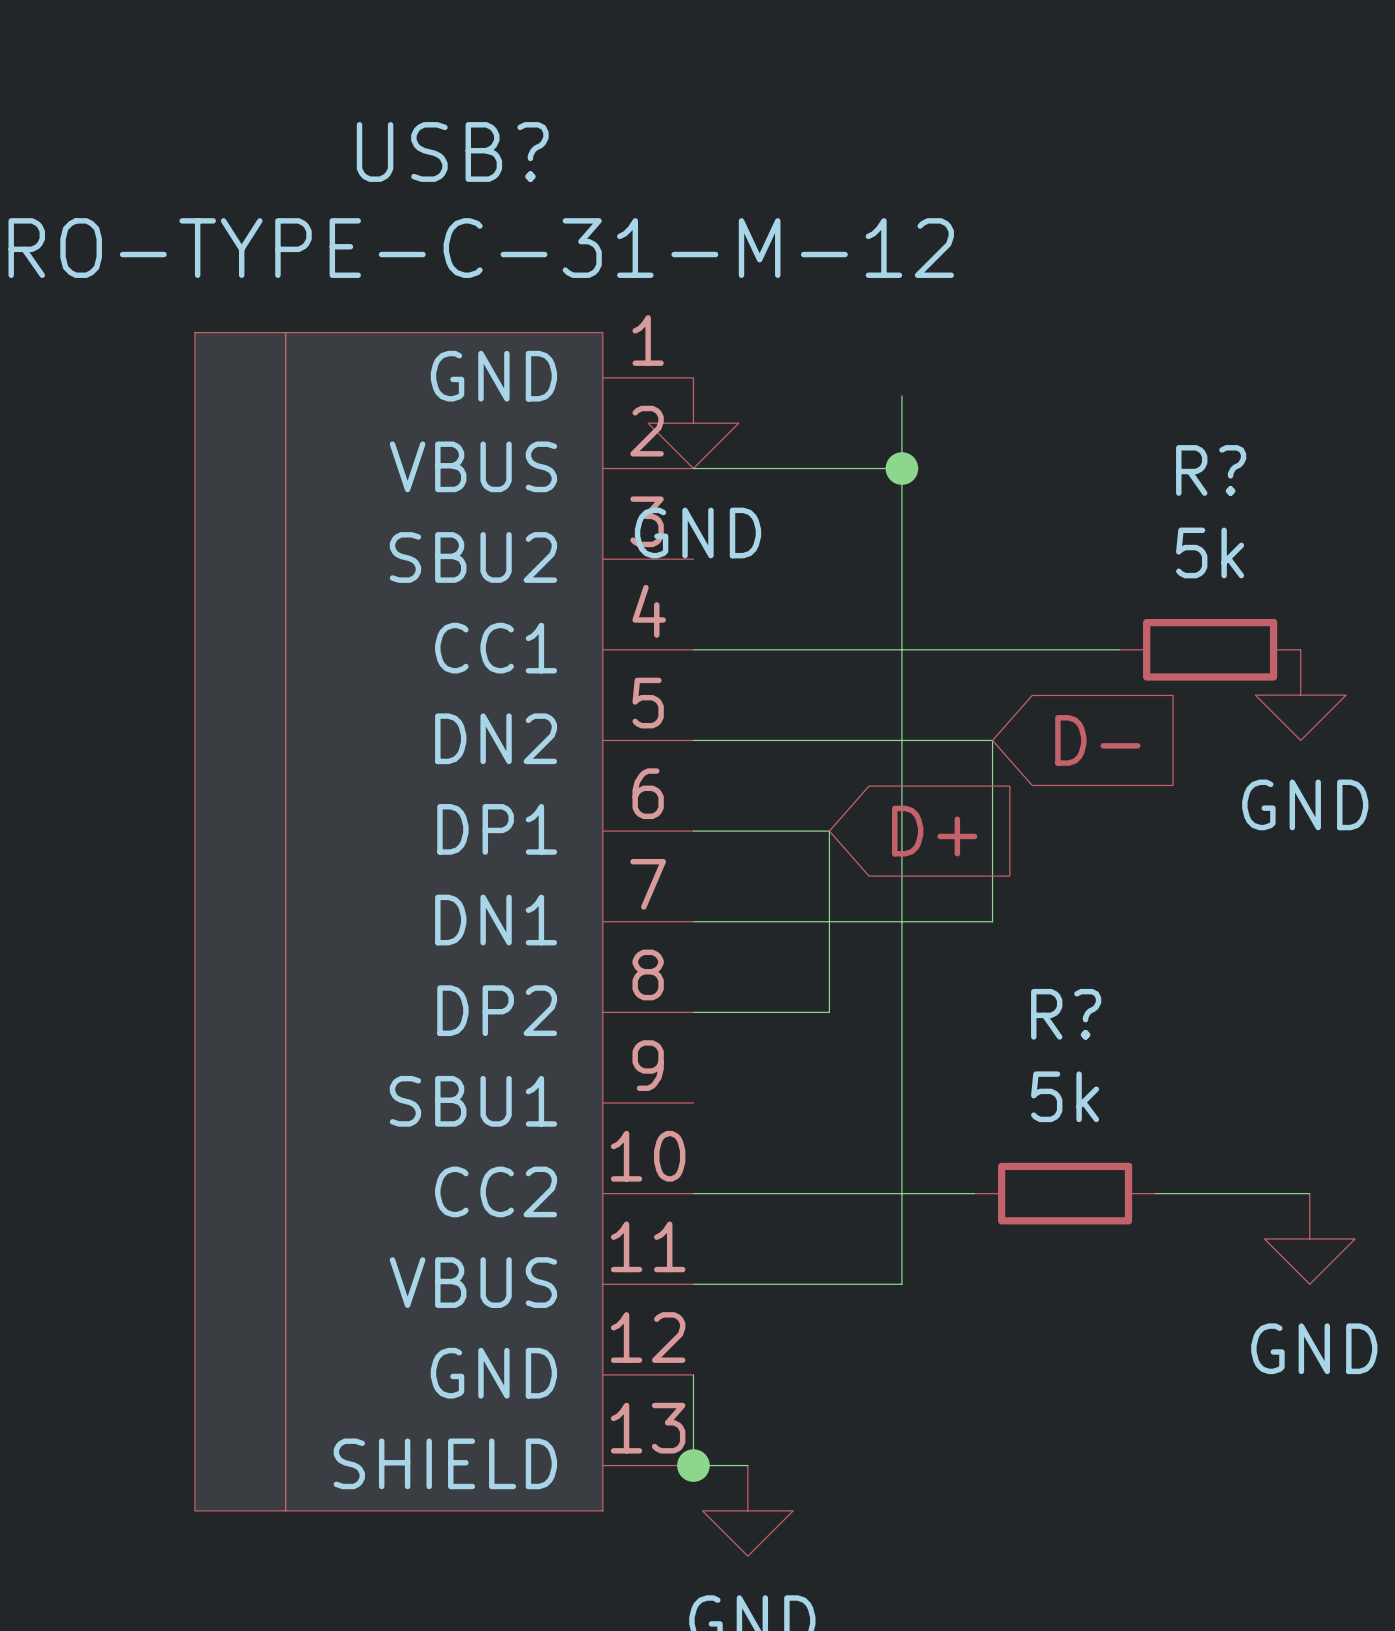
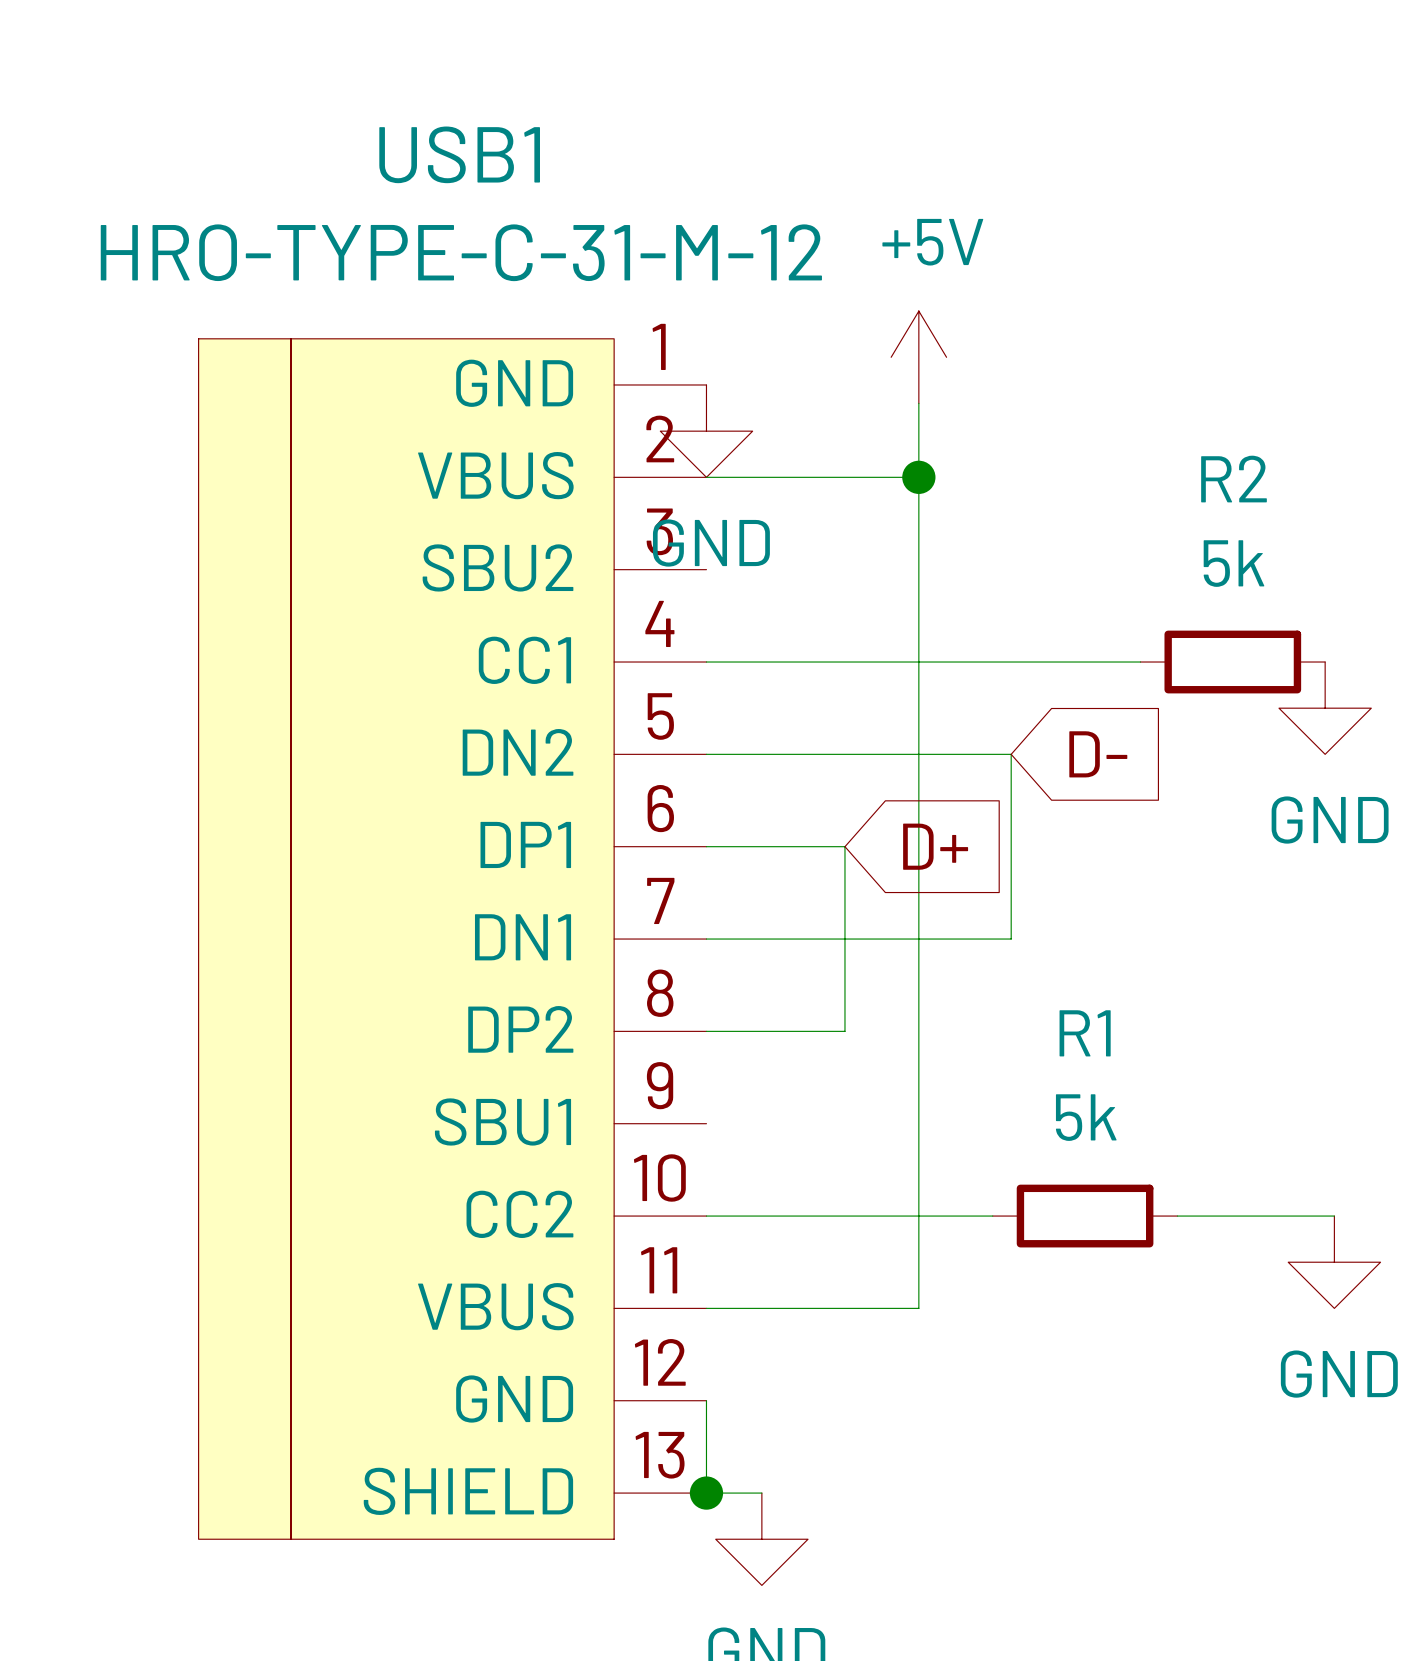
USB? name: USB? (452, 151) -> USB1 (459, 154)
power symbol: none -> +5V (918, 357)
R? name: R? (1211, 470) -> R2 (1233, 479)
R? name: R? (1066, 1014) -> R1 (1085, 1033)

